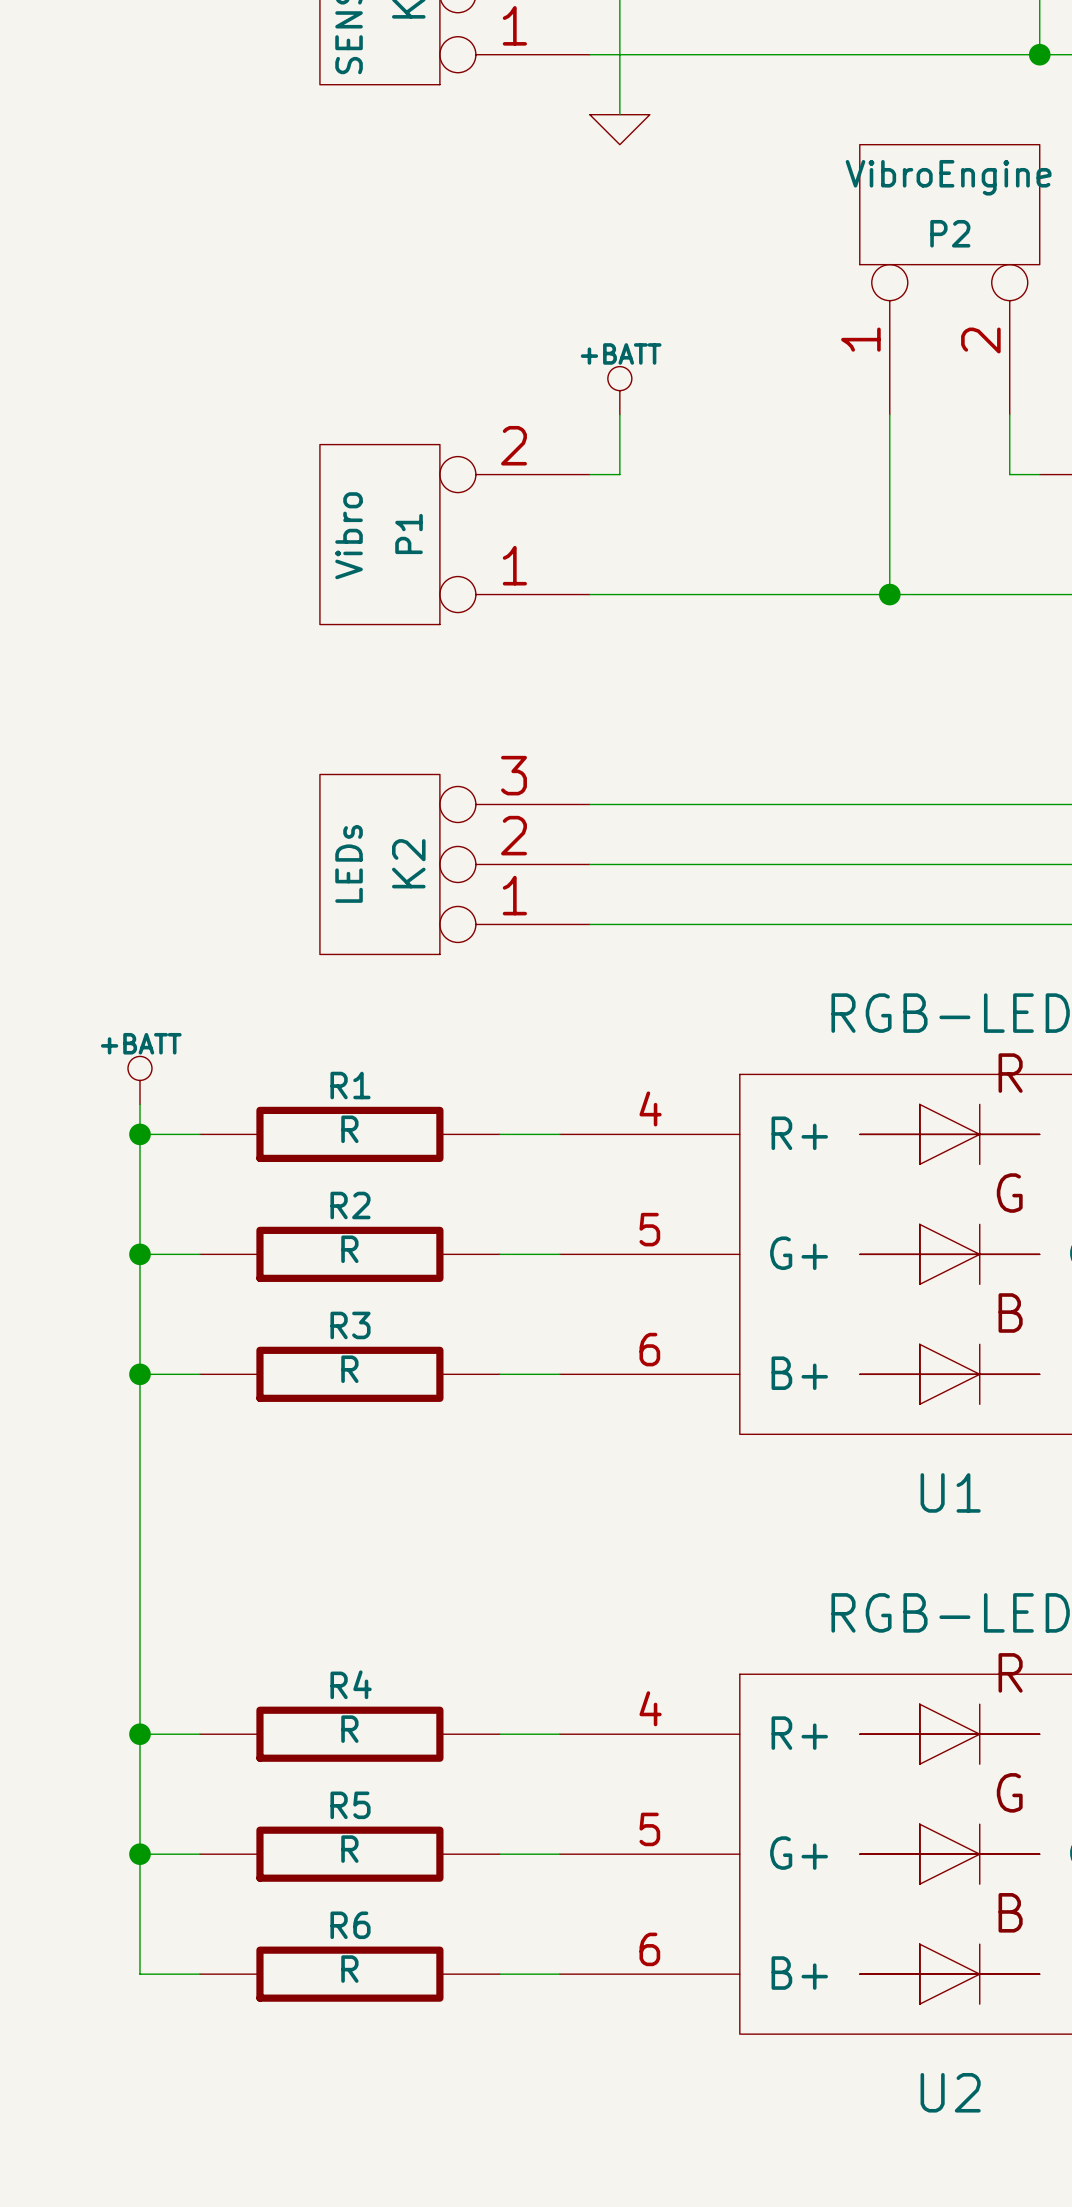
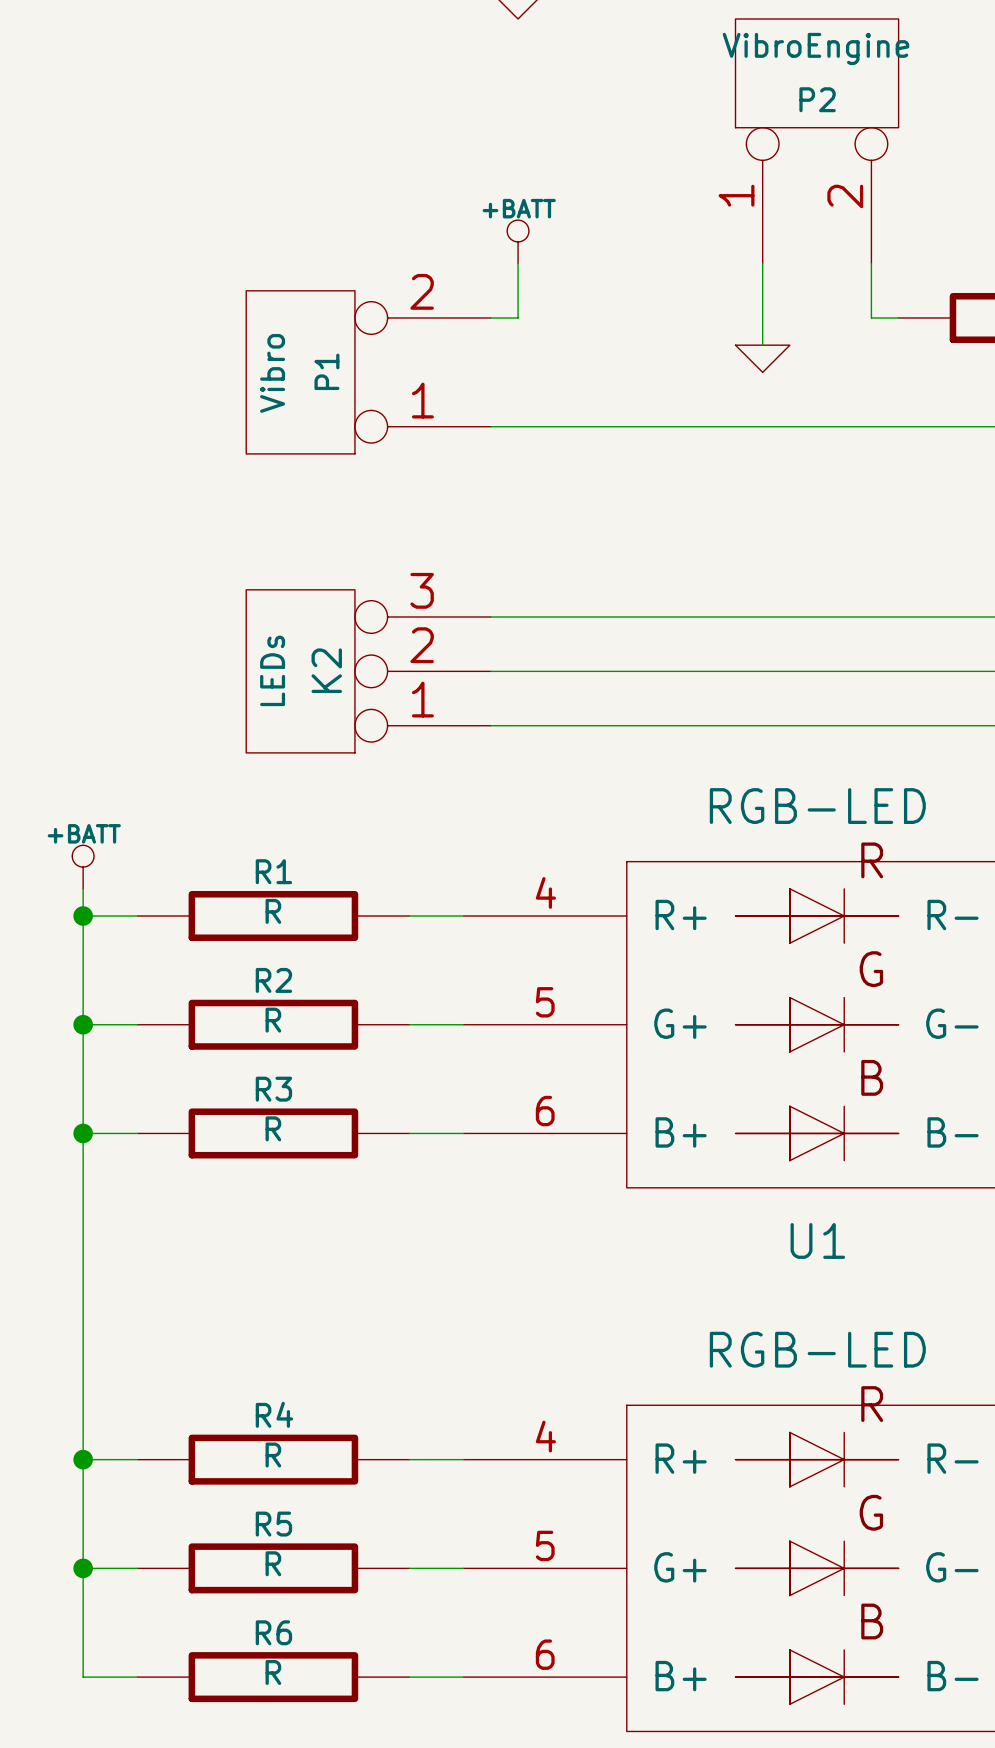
wire: (889, 504) (889, 594) -> none
power symbol: none -> (762, 358)
junction: (889, 594) -> none

